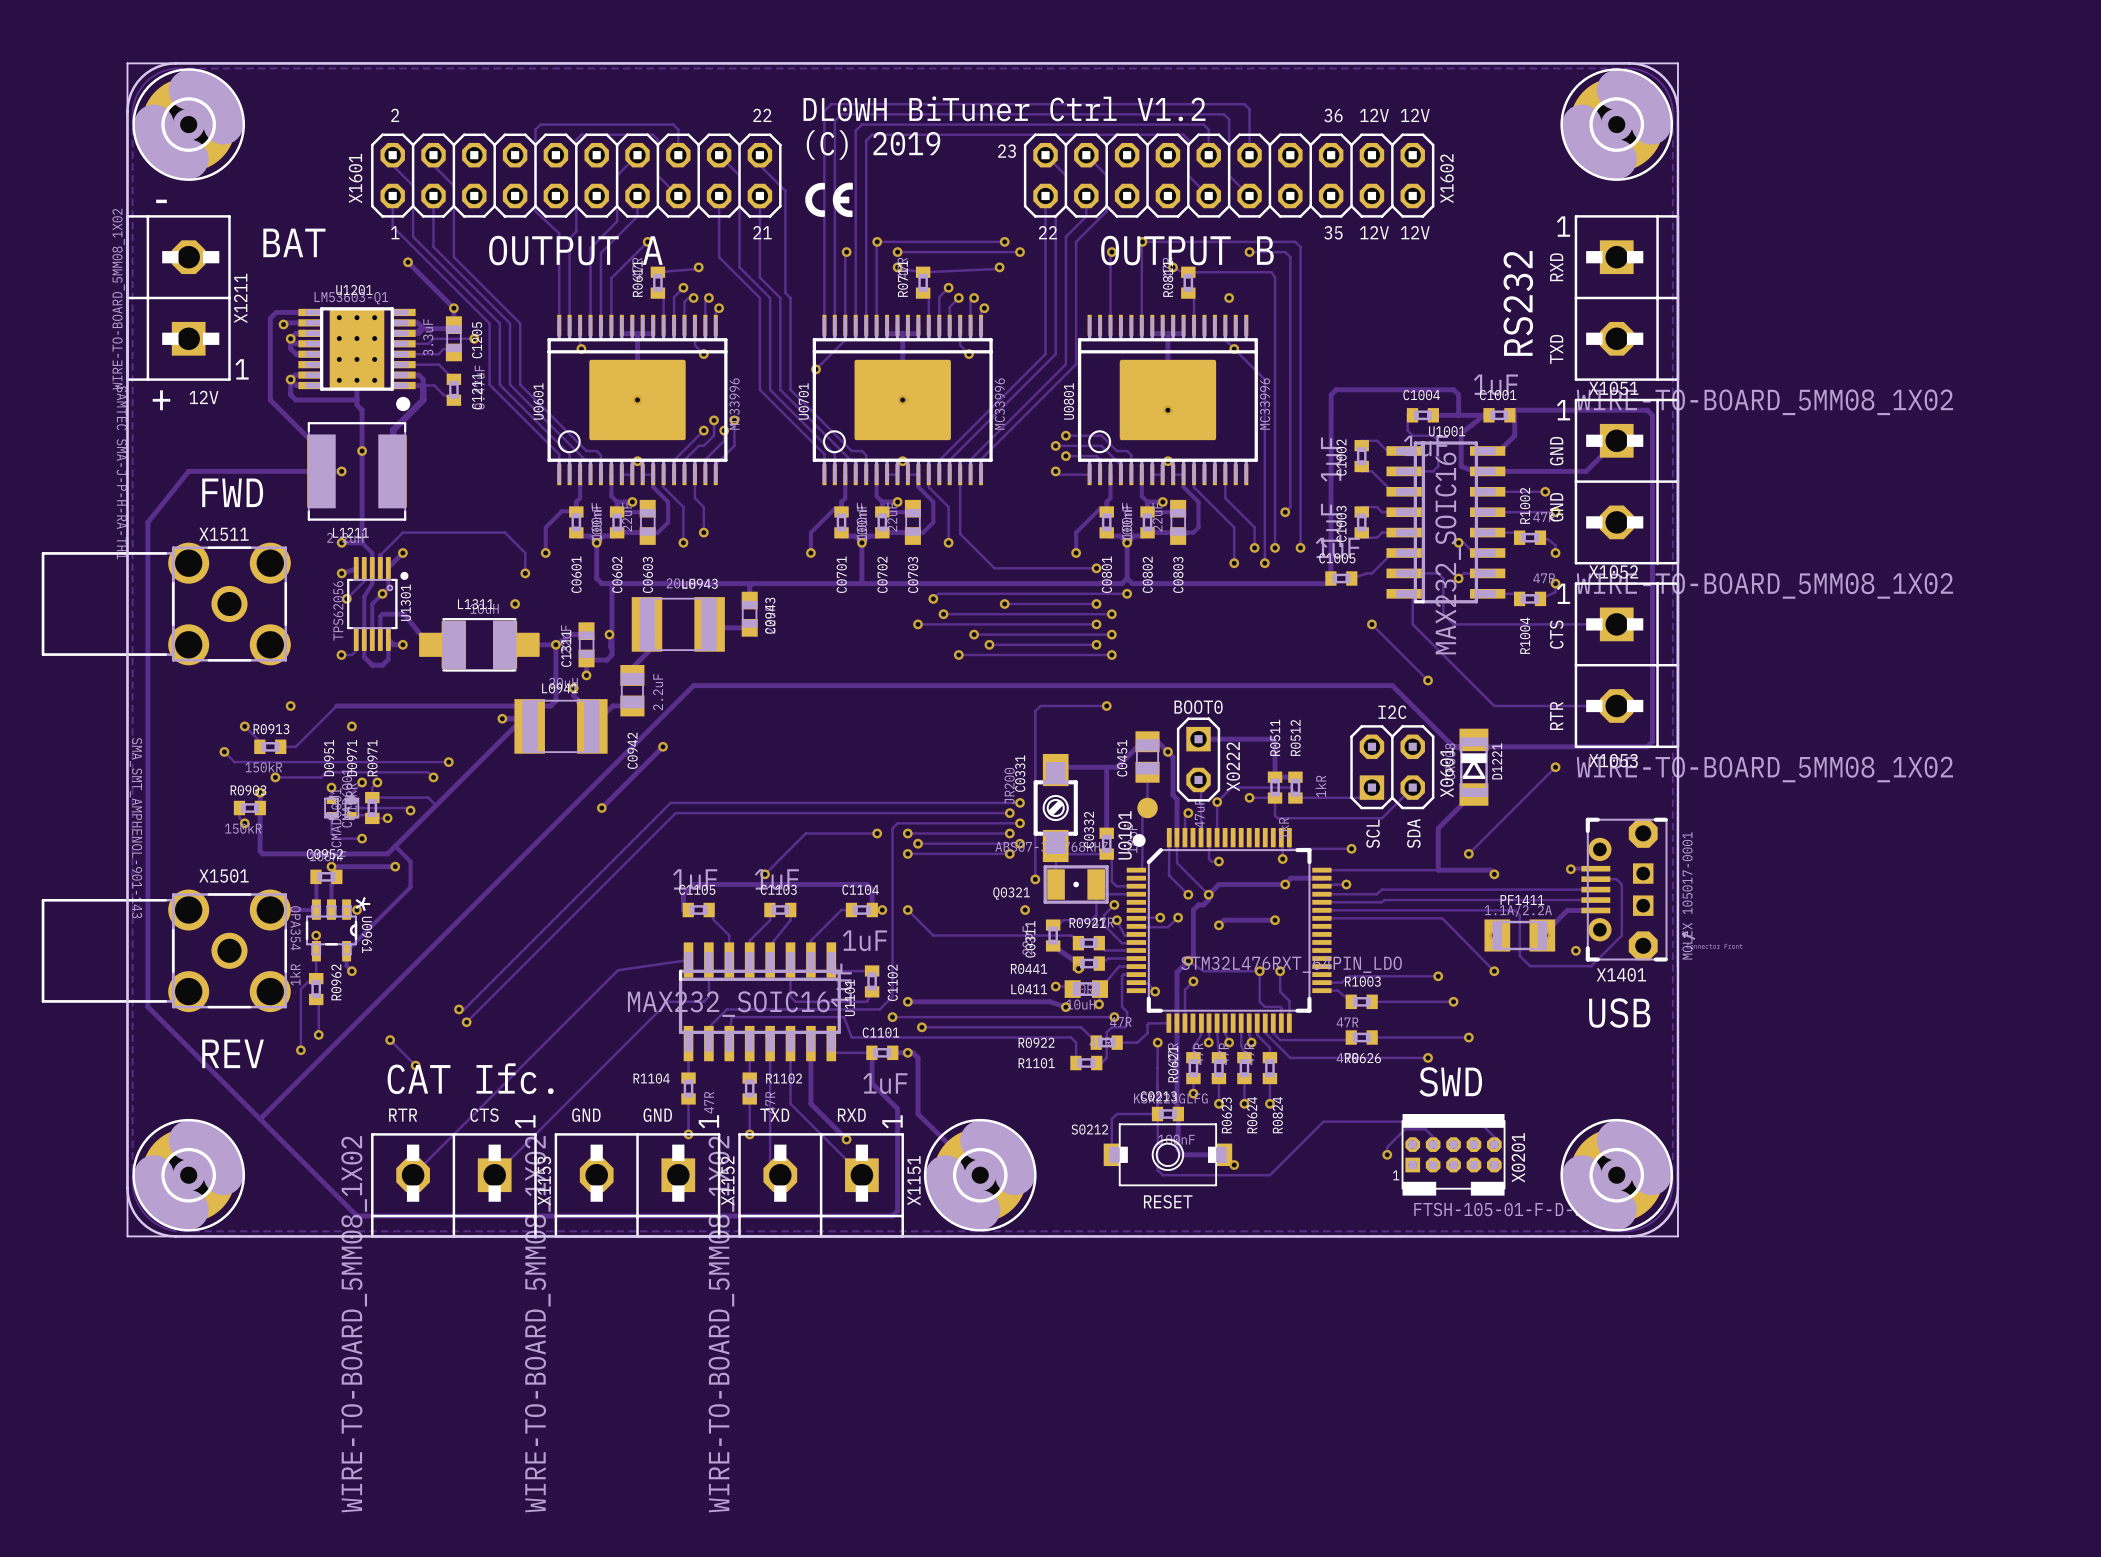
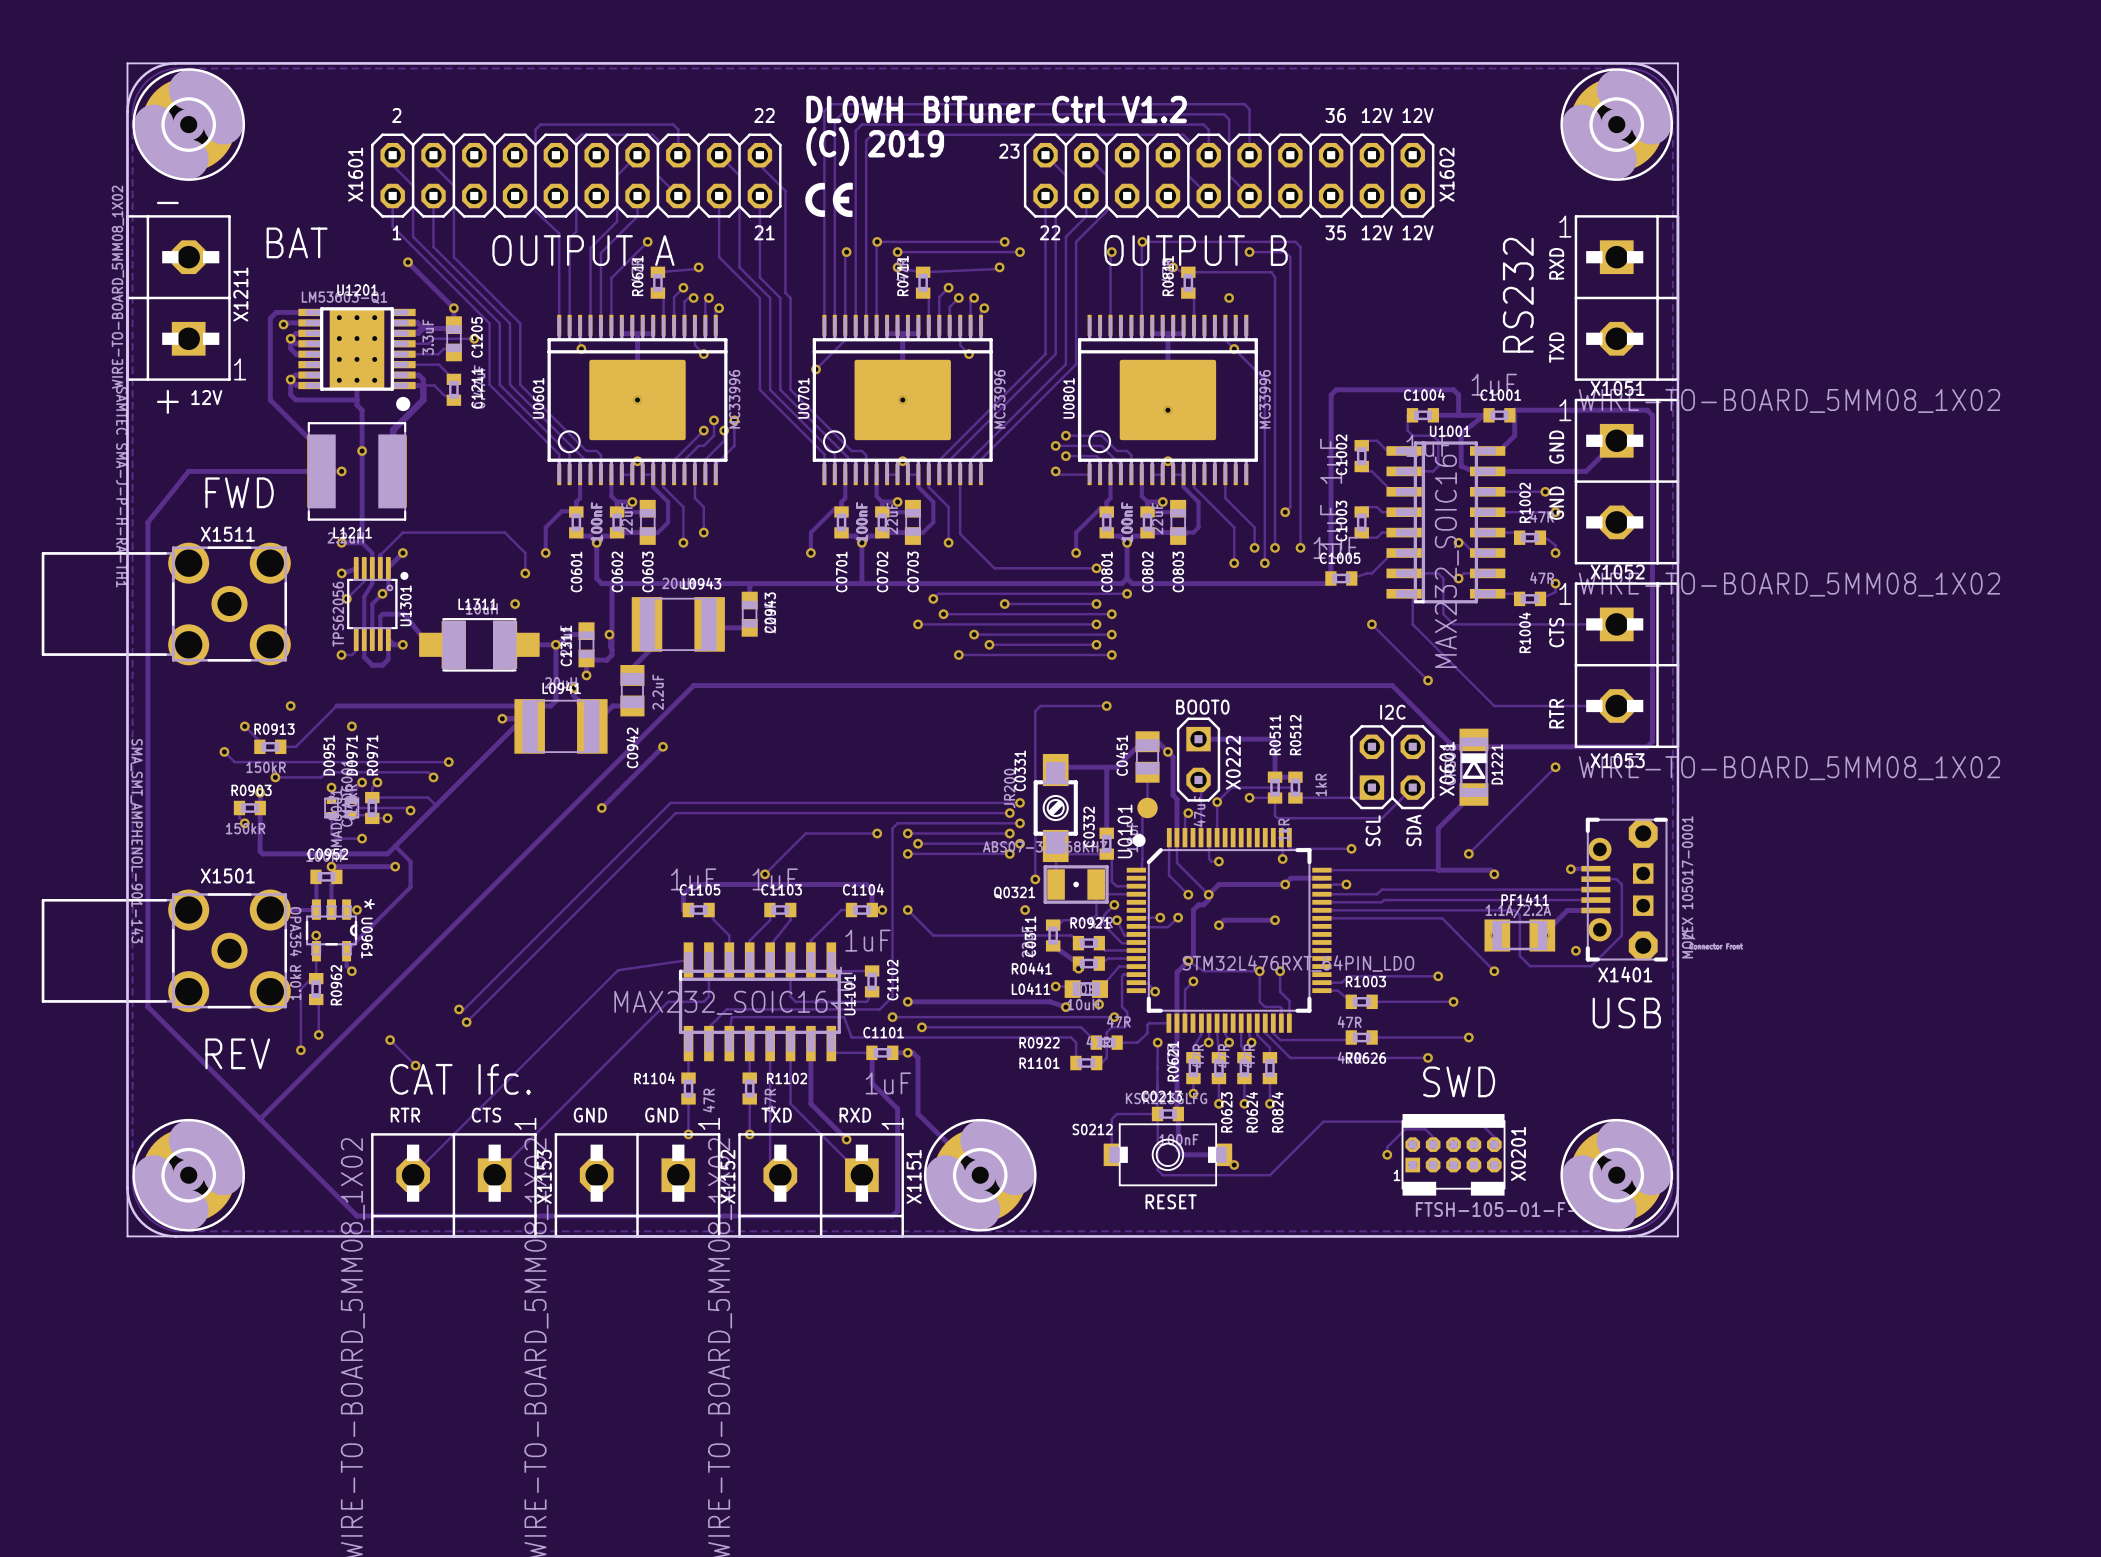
R0962 value: 1kR (295, 974) -> 1.0kR (295, 982)

